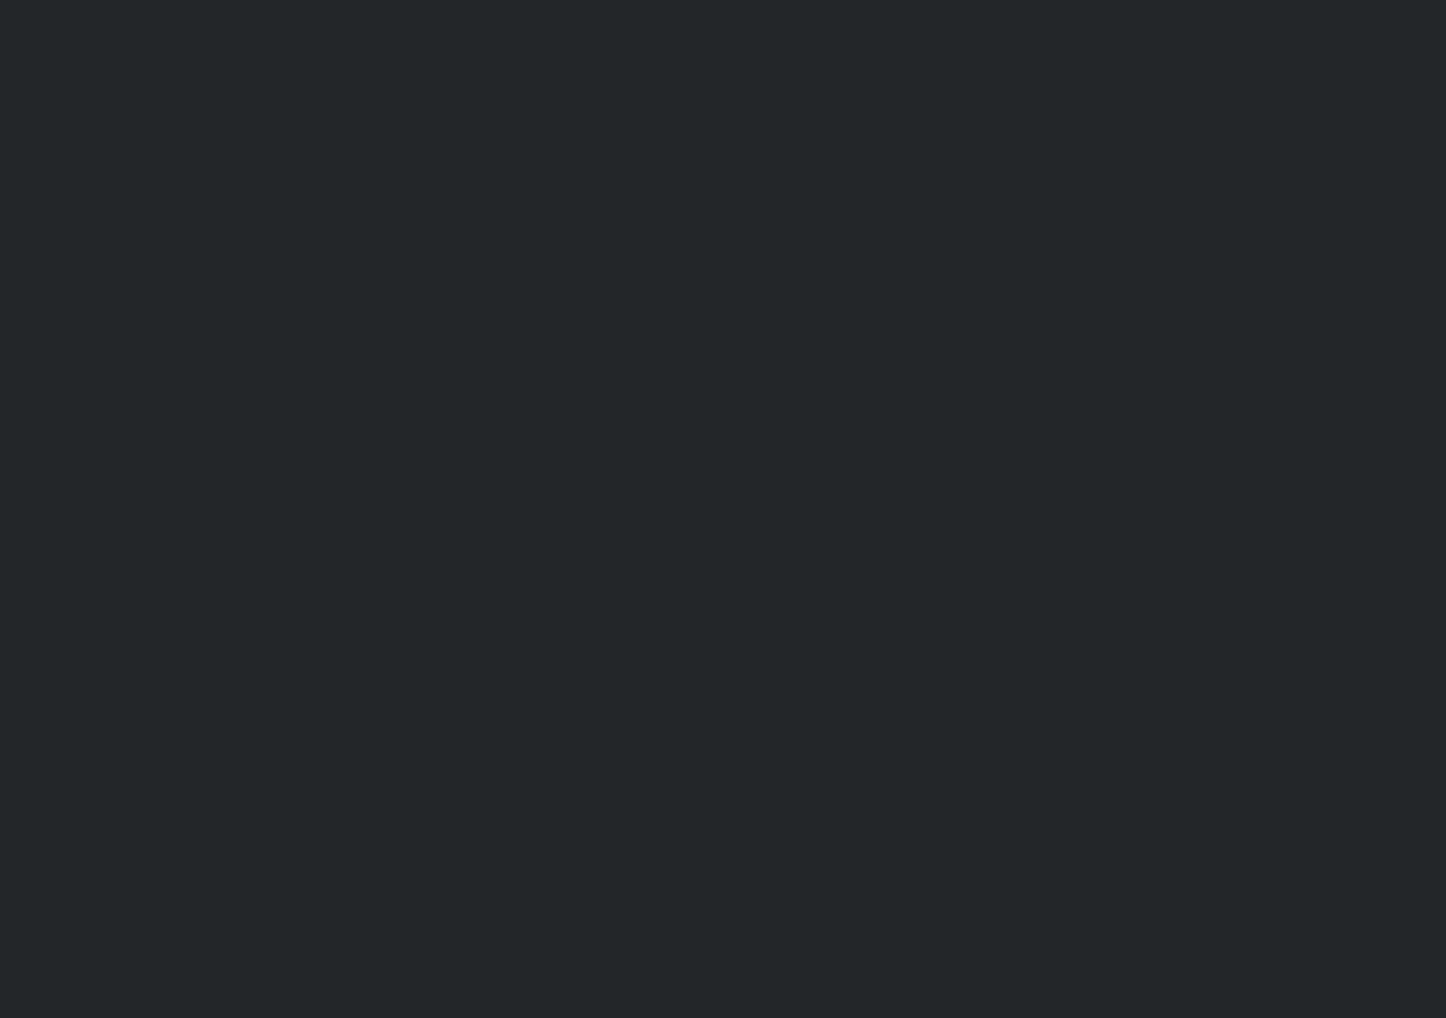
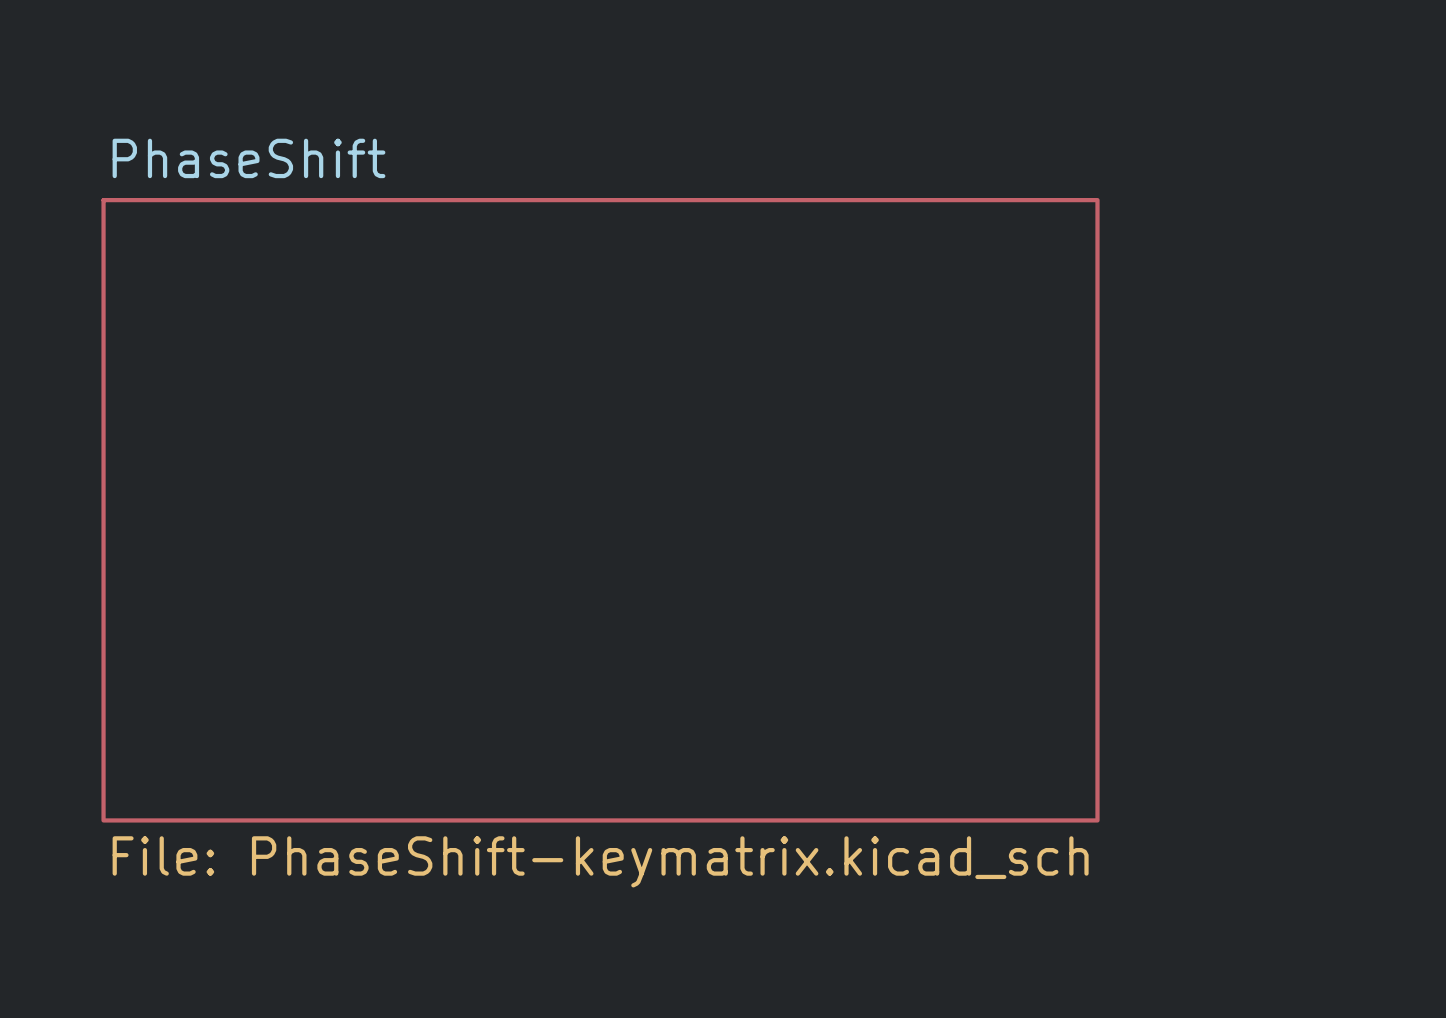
sheet PhaseShift: none -> File: PhaseShift-keymatrix.kicad_sch (600, 510)

